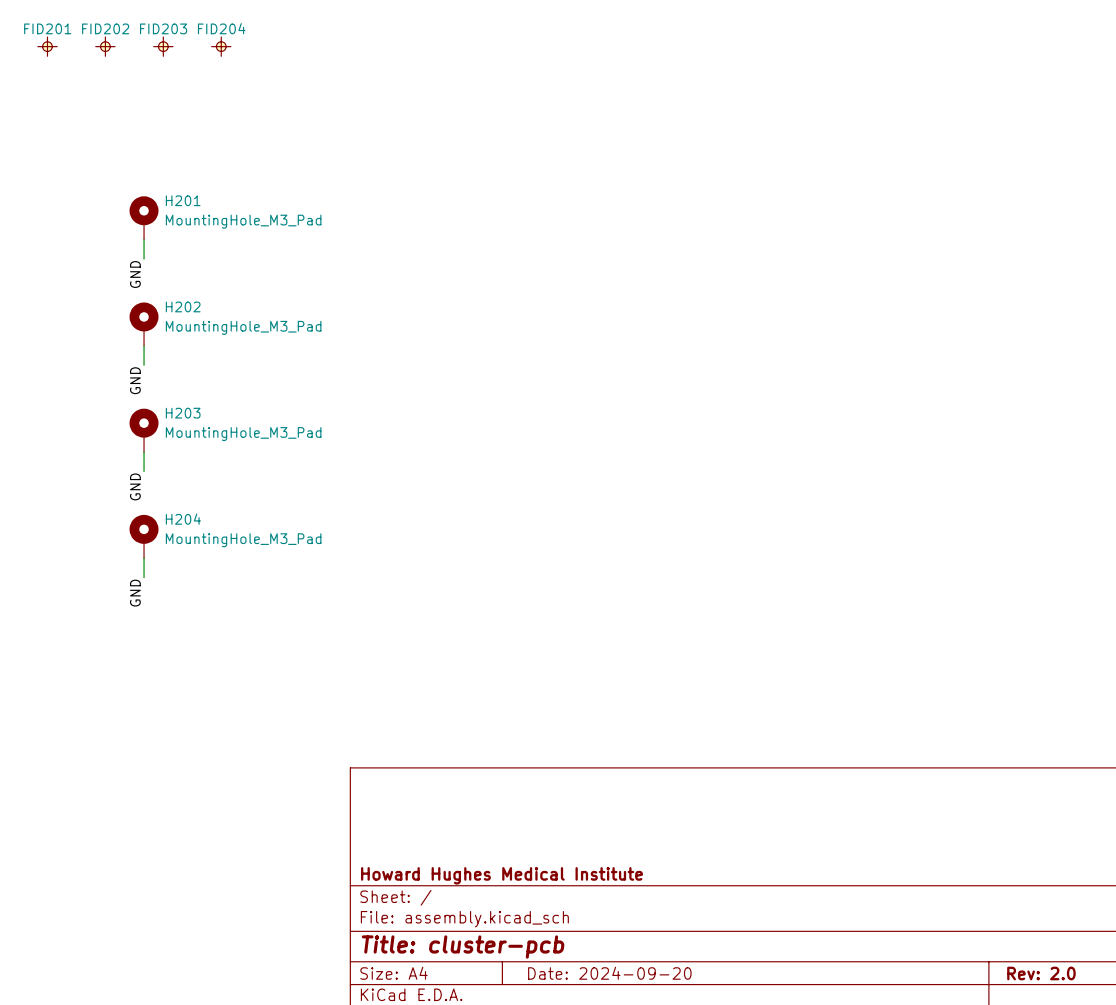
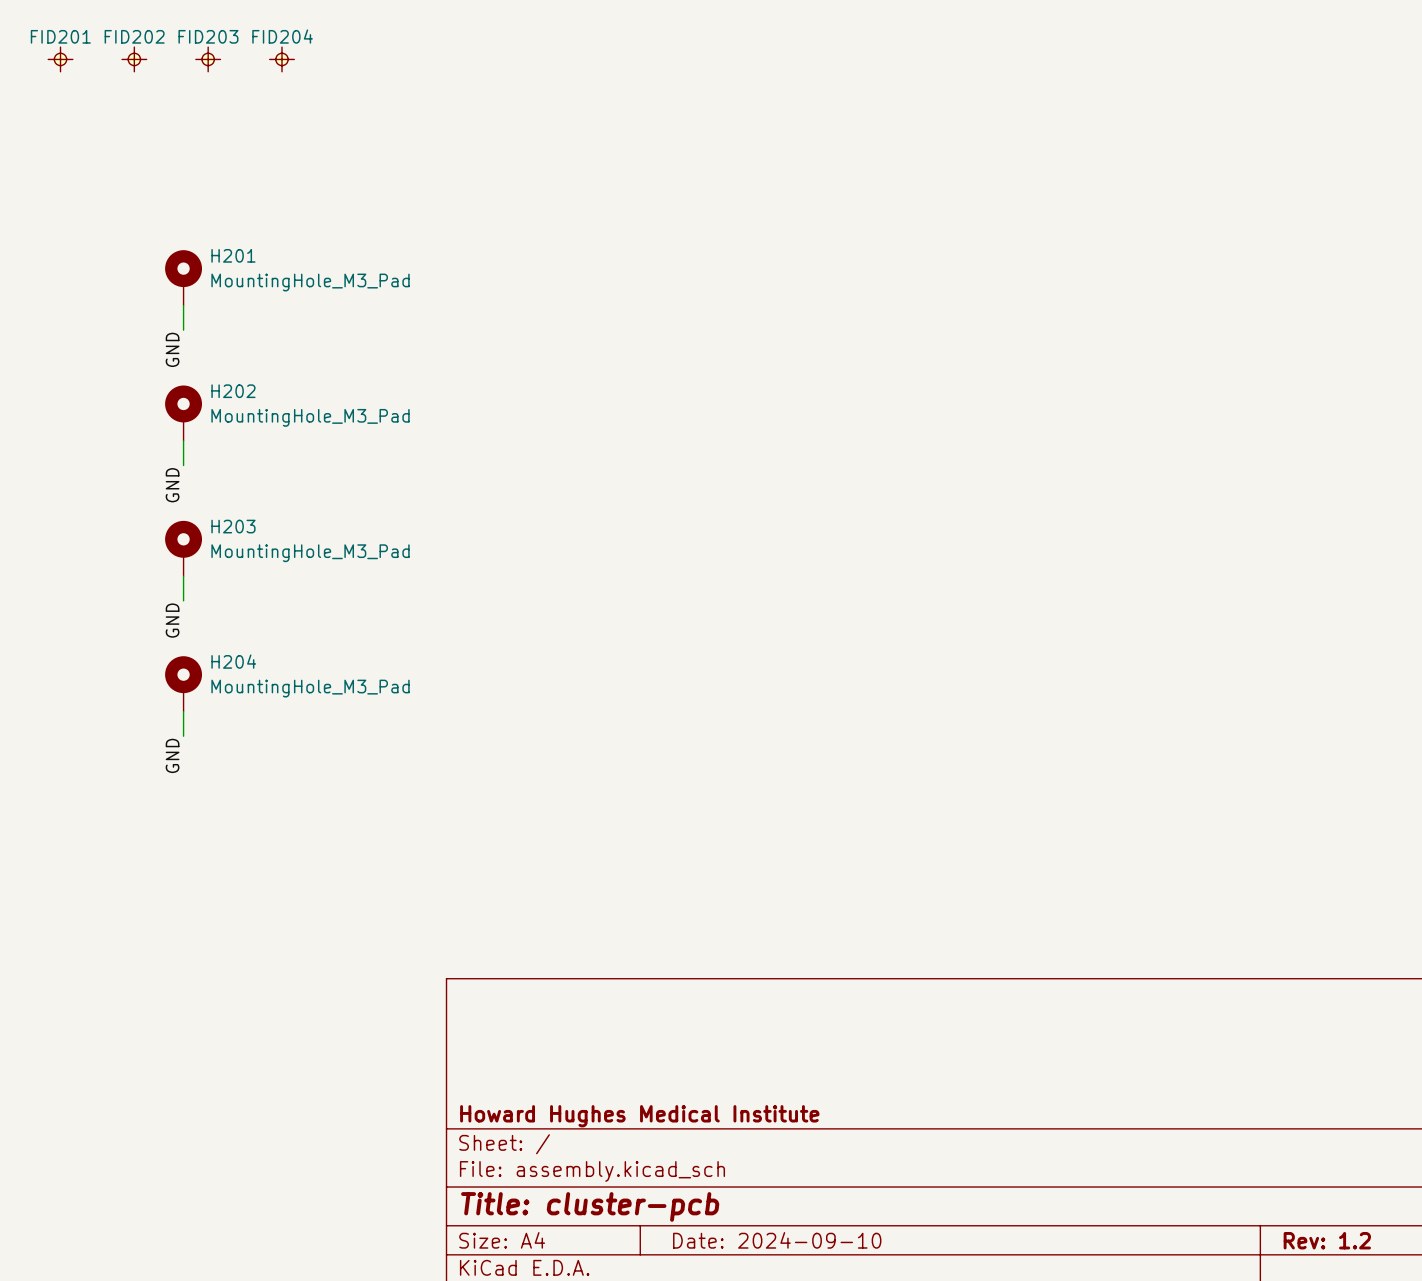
title block: Date: 2024-09-20 (609, 973) -> Date: 2024-09-10 (777, 1240)
title block: Rev: 2.0 (1041, 973) -> Rev: 1.2 (1327, 1240)

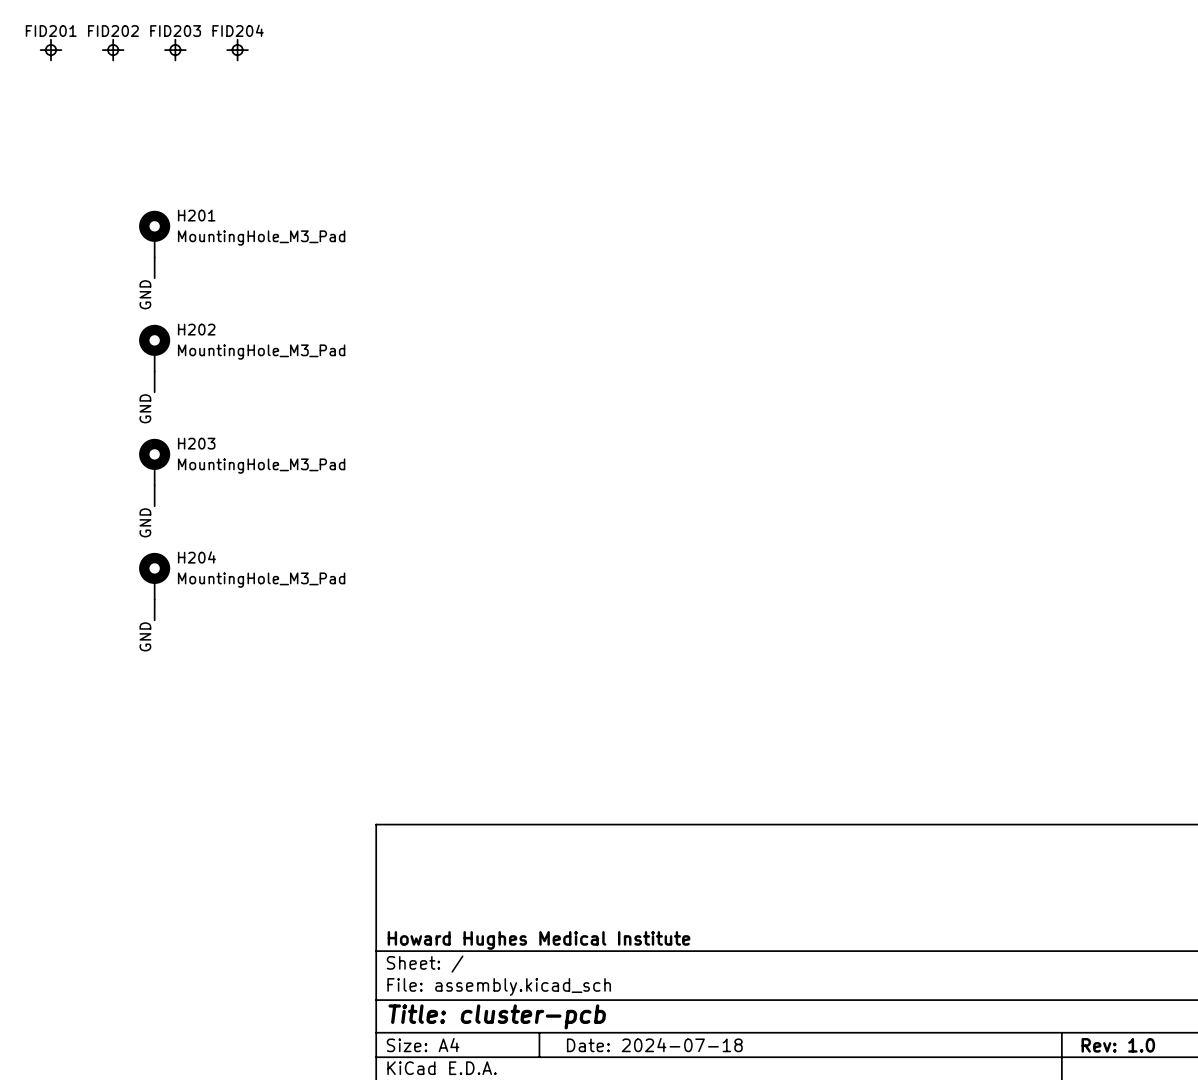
title block: Date: 2024-09-10 (777, 1240) -> Date: 2024-07-18 (654, 1045)
title block: Rev: 1.2 (1327, 1240) -> Rev: 1.0 (1118, 1045)

